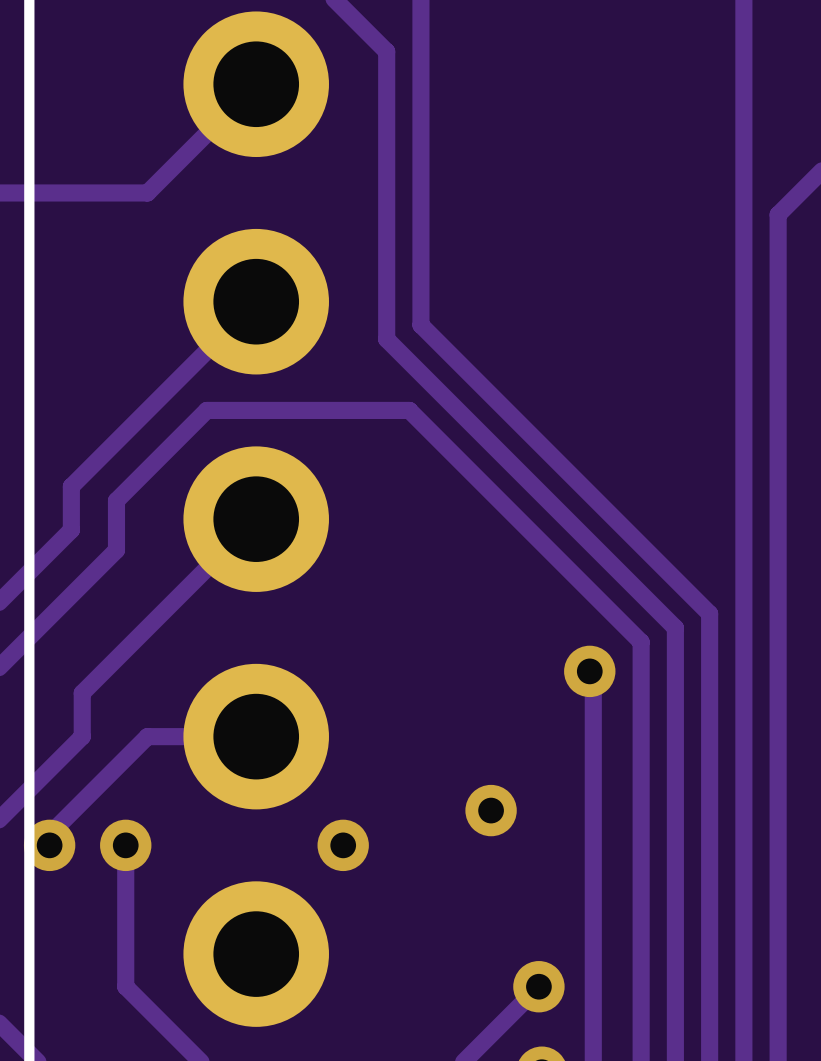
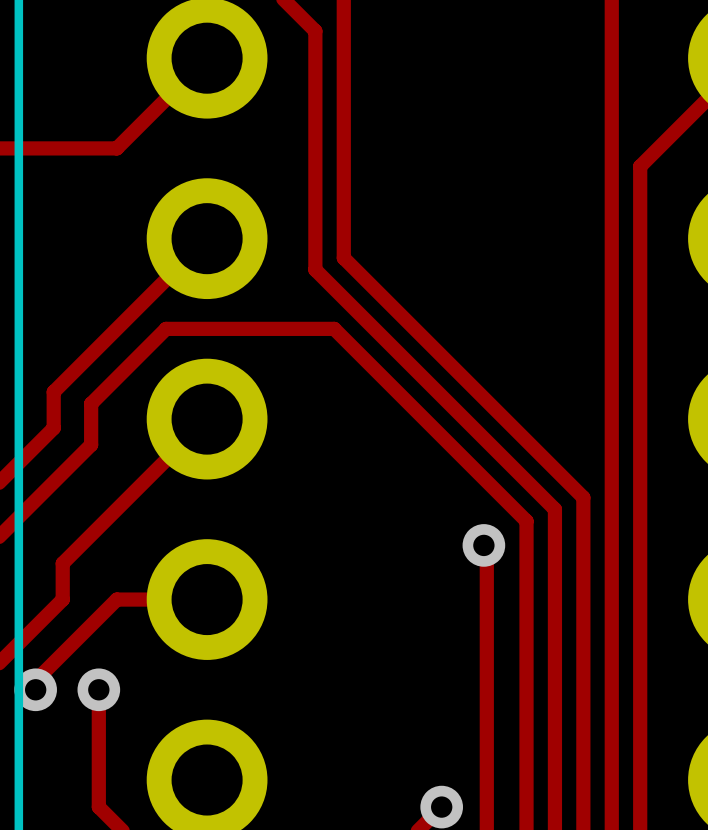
via: (491, 810) -> none
via: (343, 845) -> none

